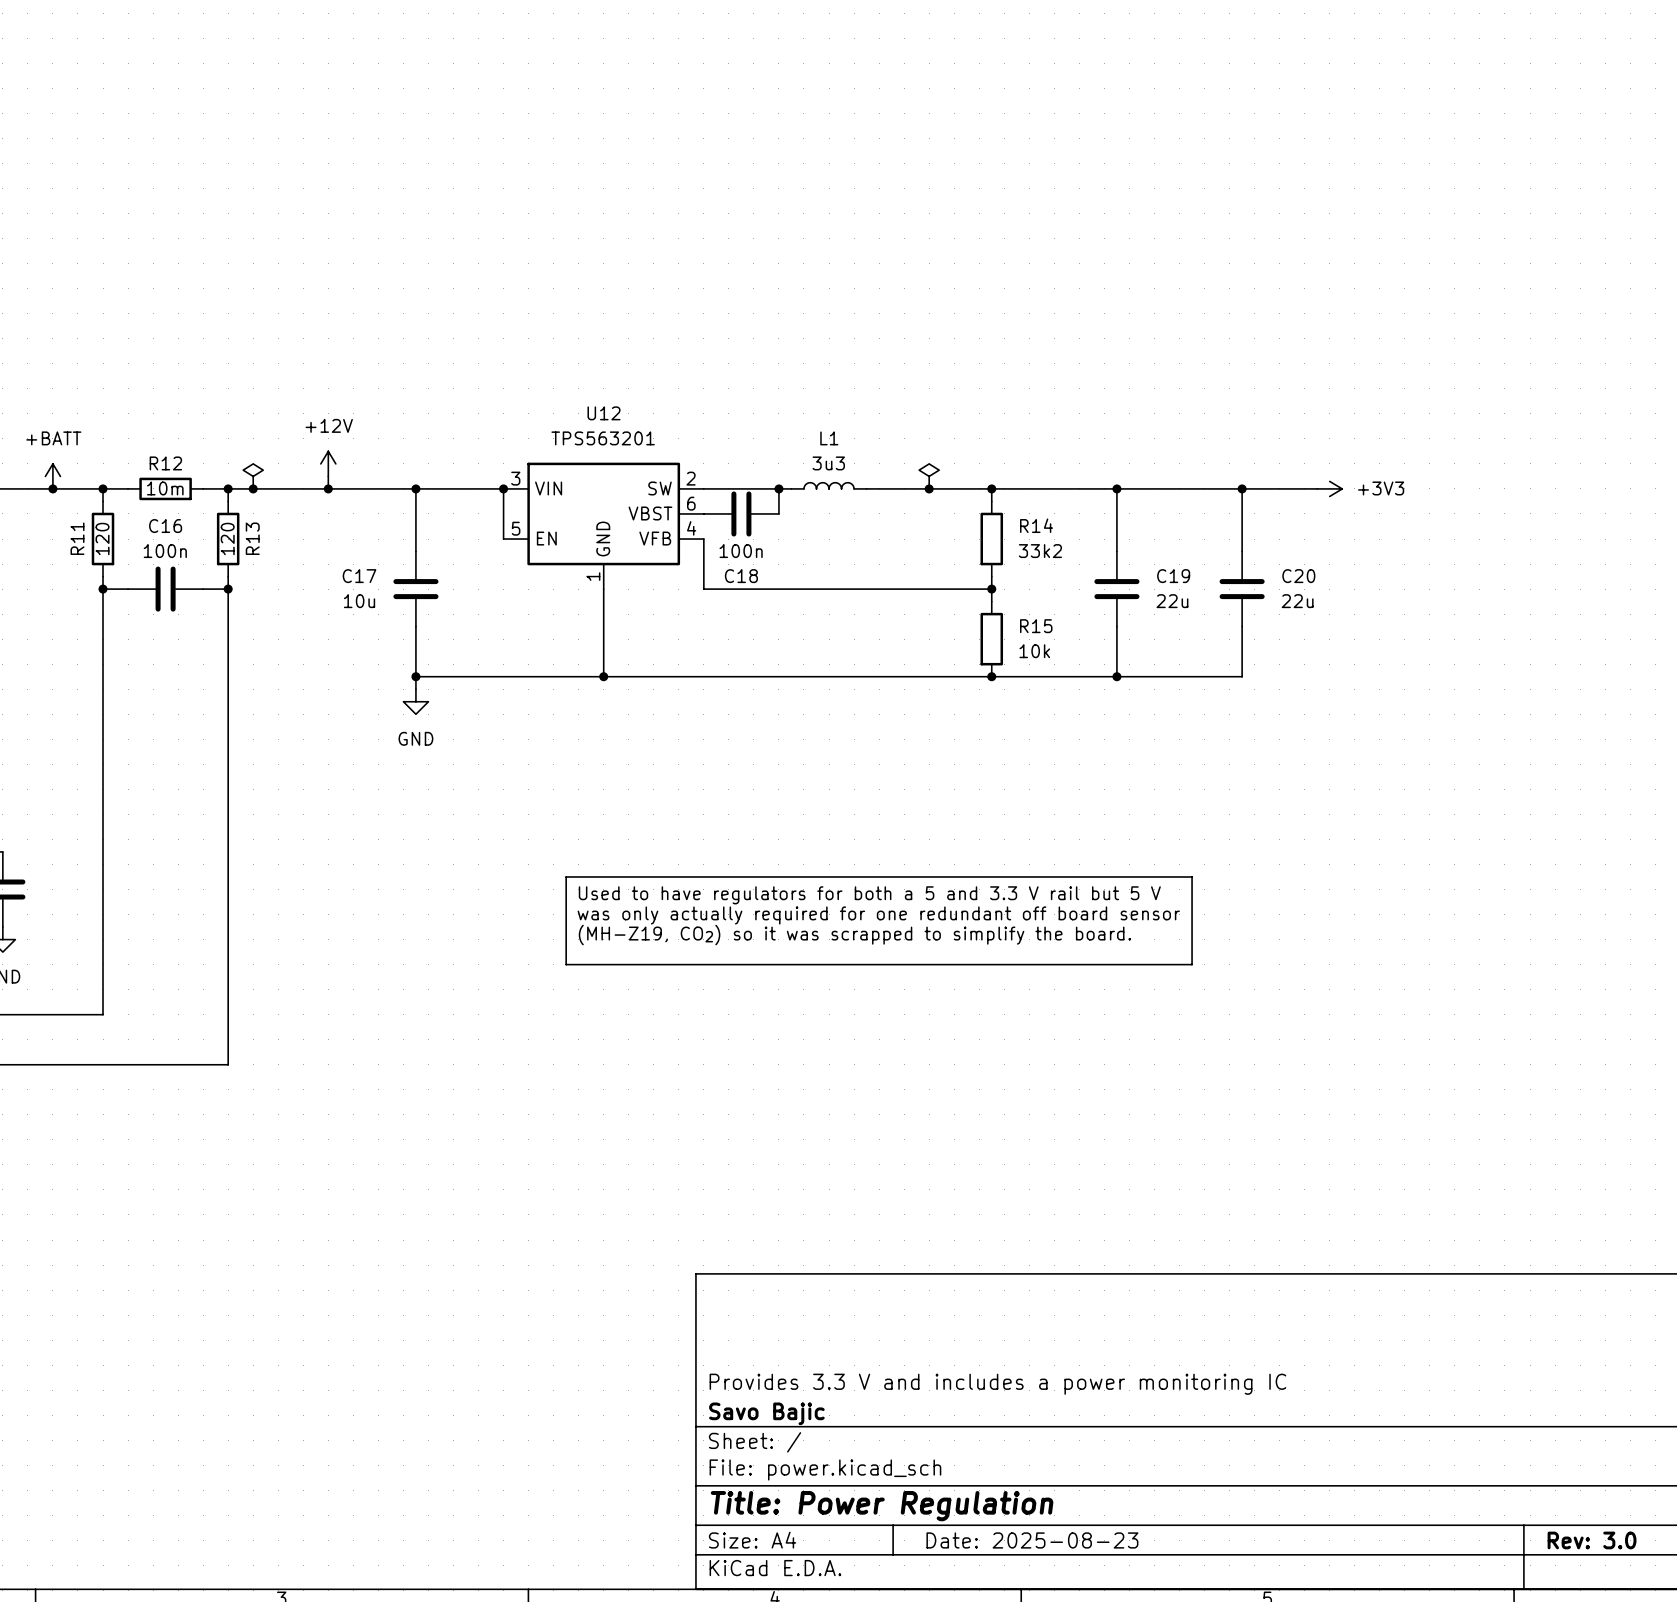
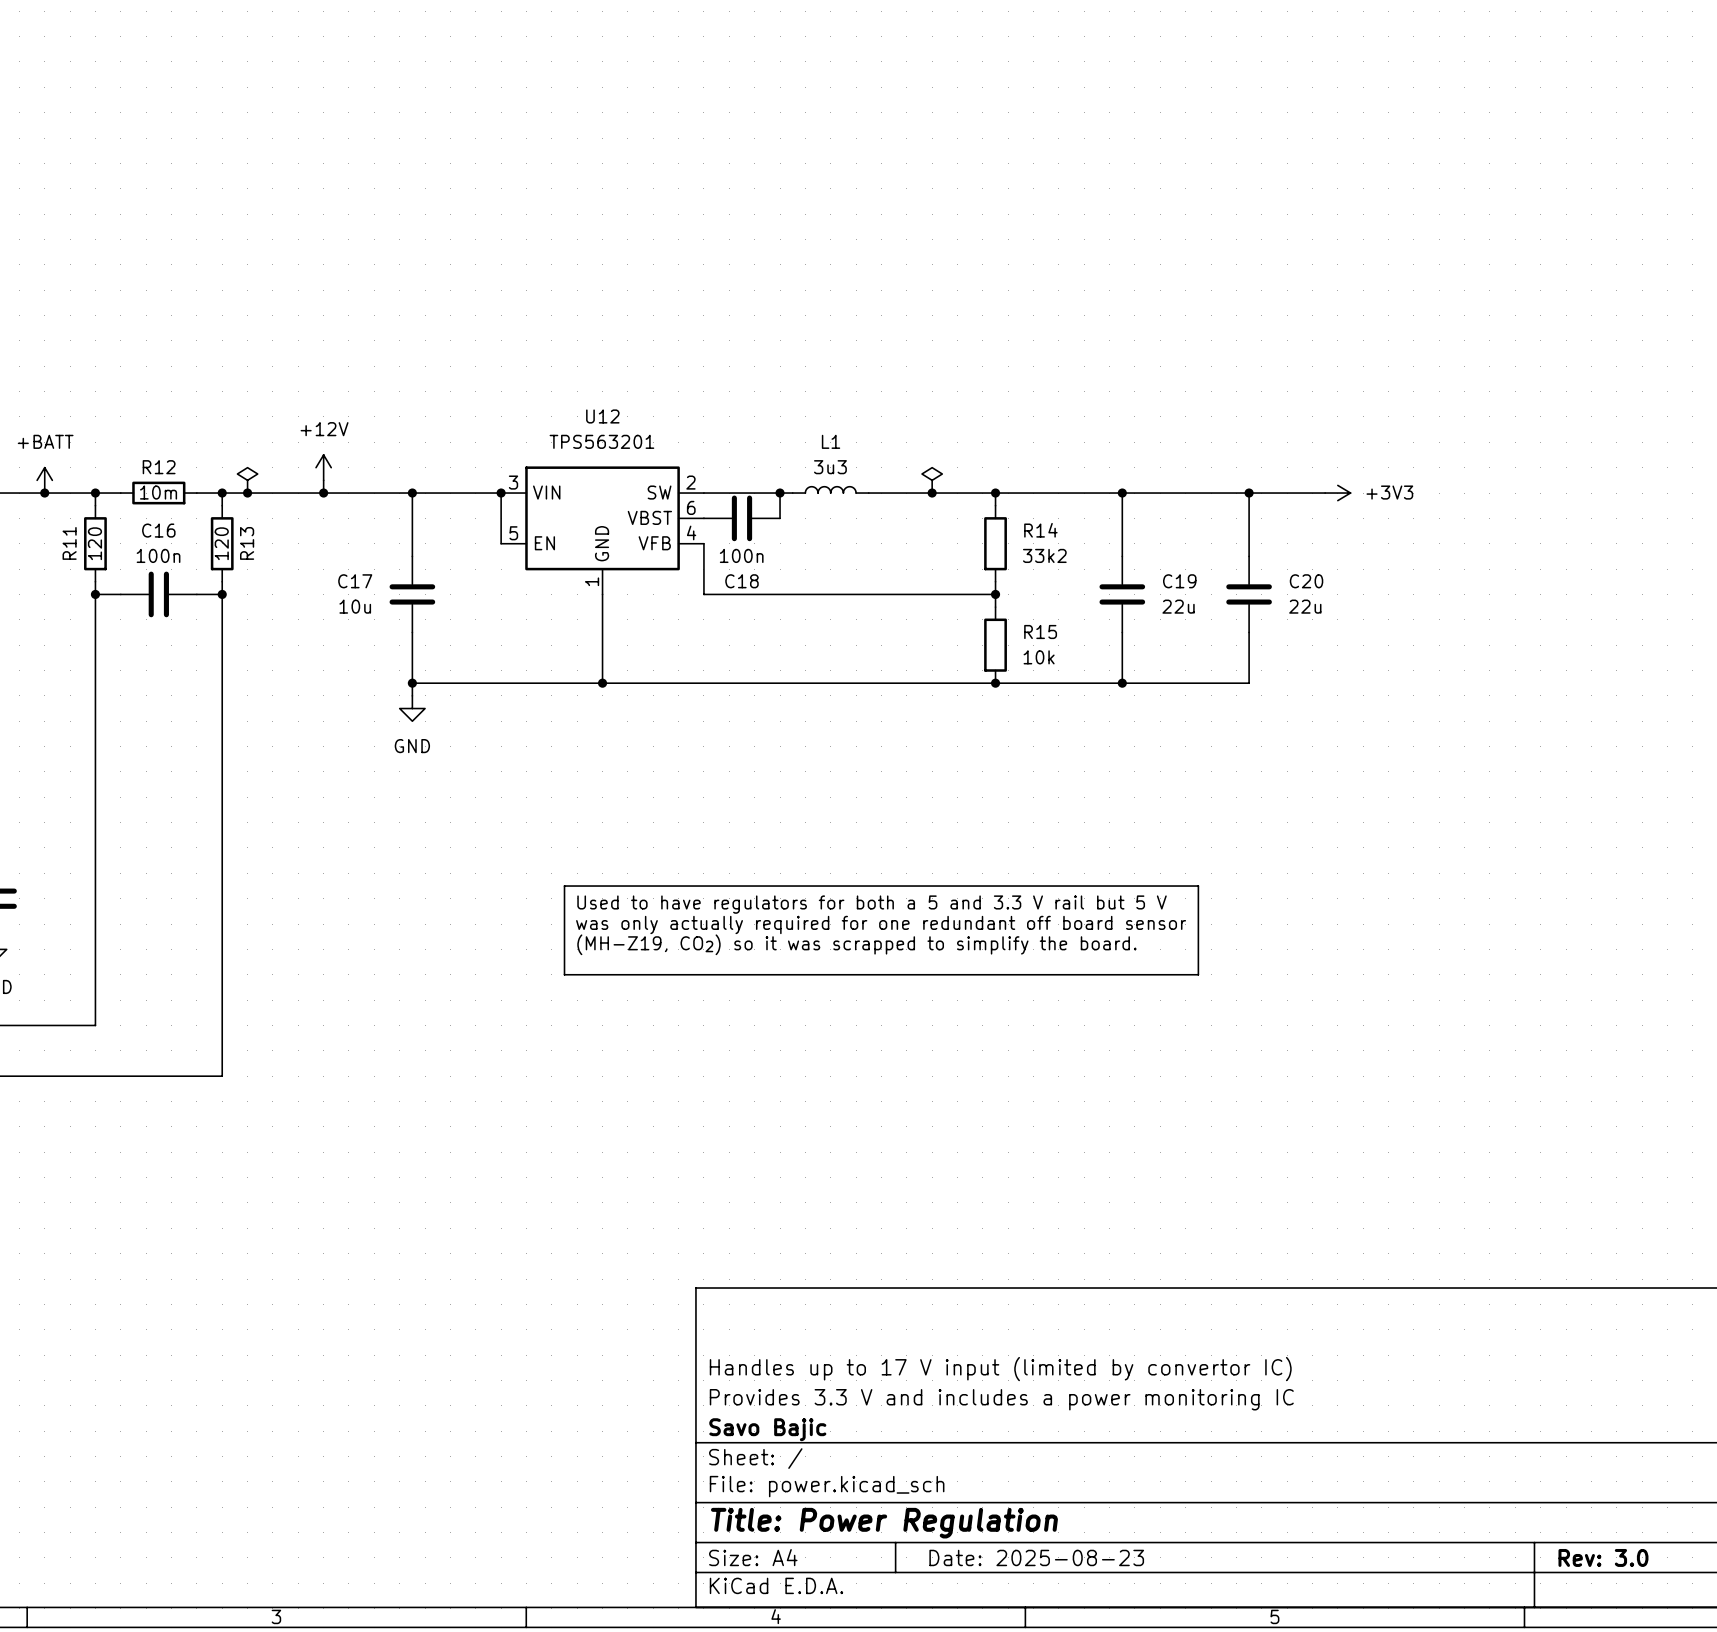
title block: none -> Handles up to 17 V input (limited by convertor IC) (1000, 1369)

